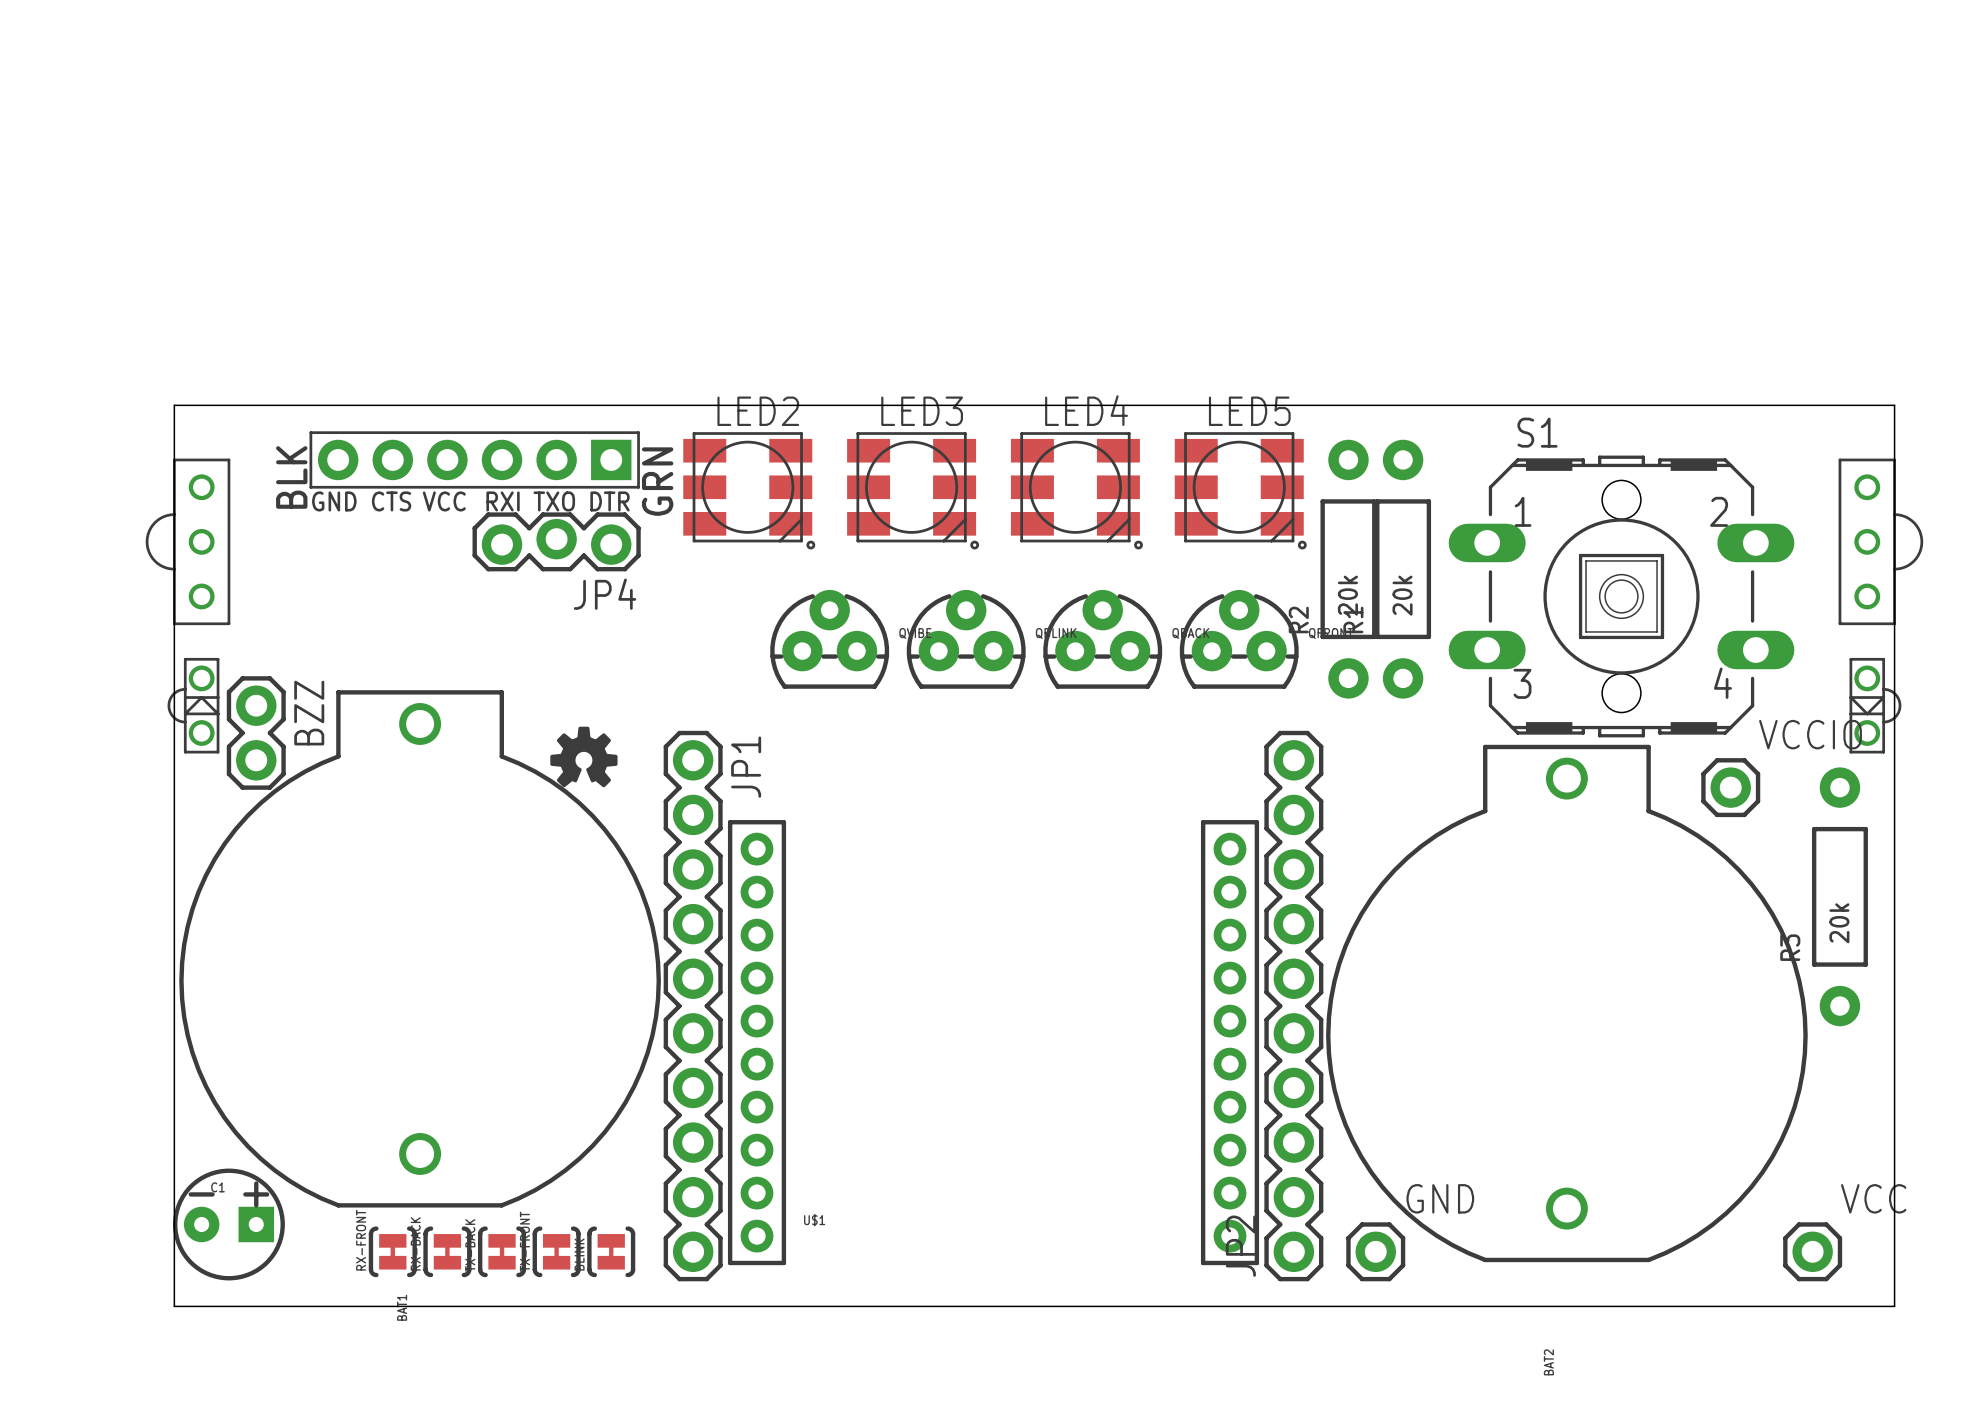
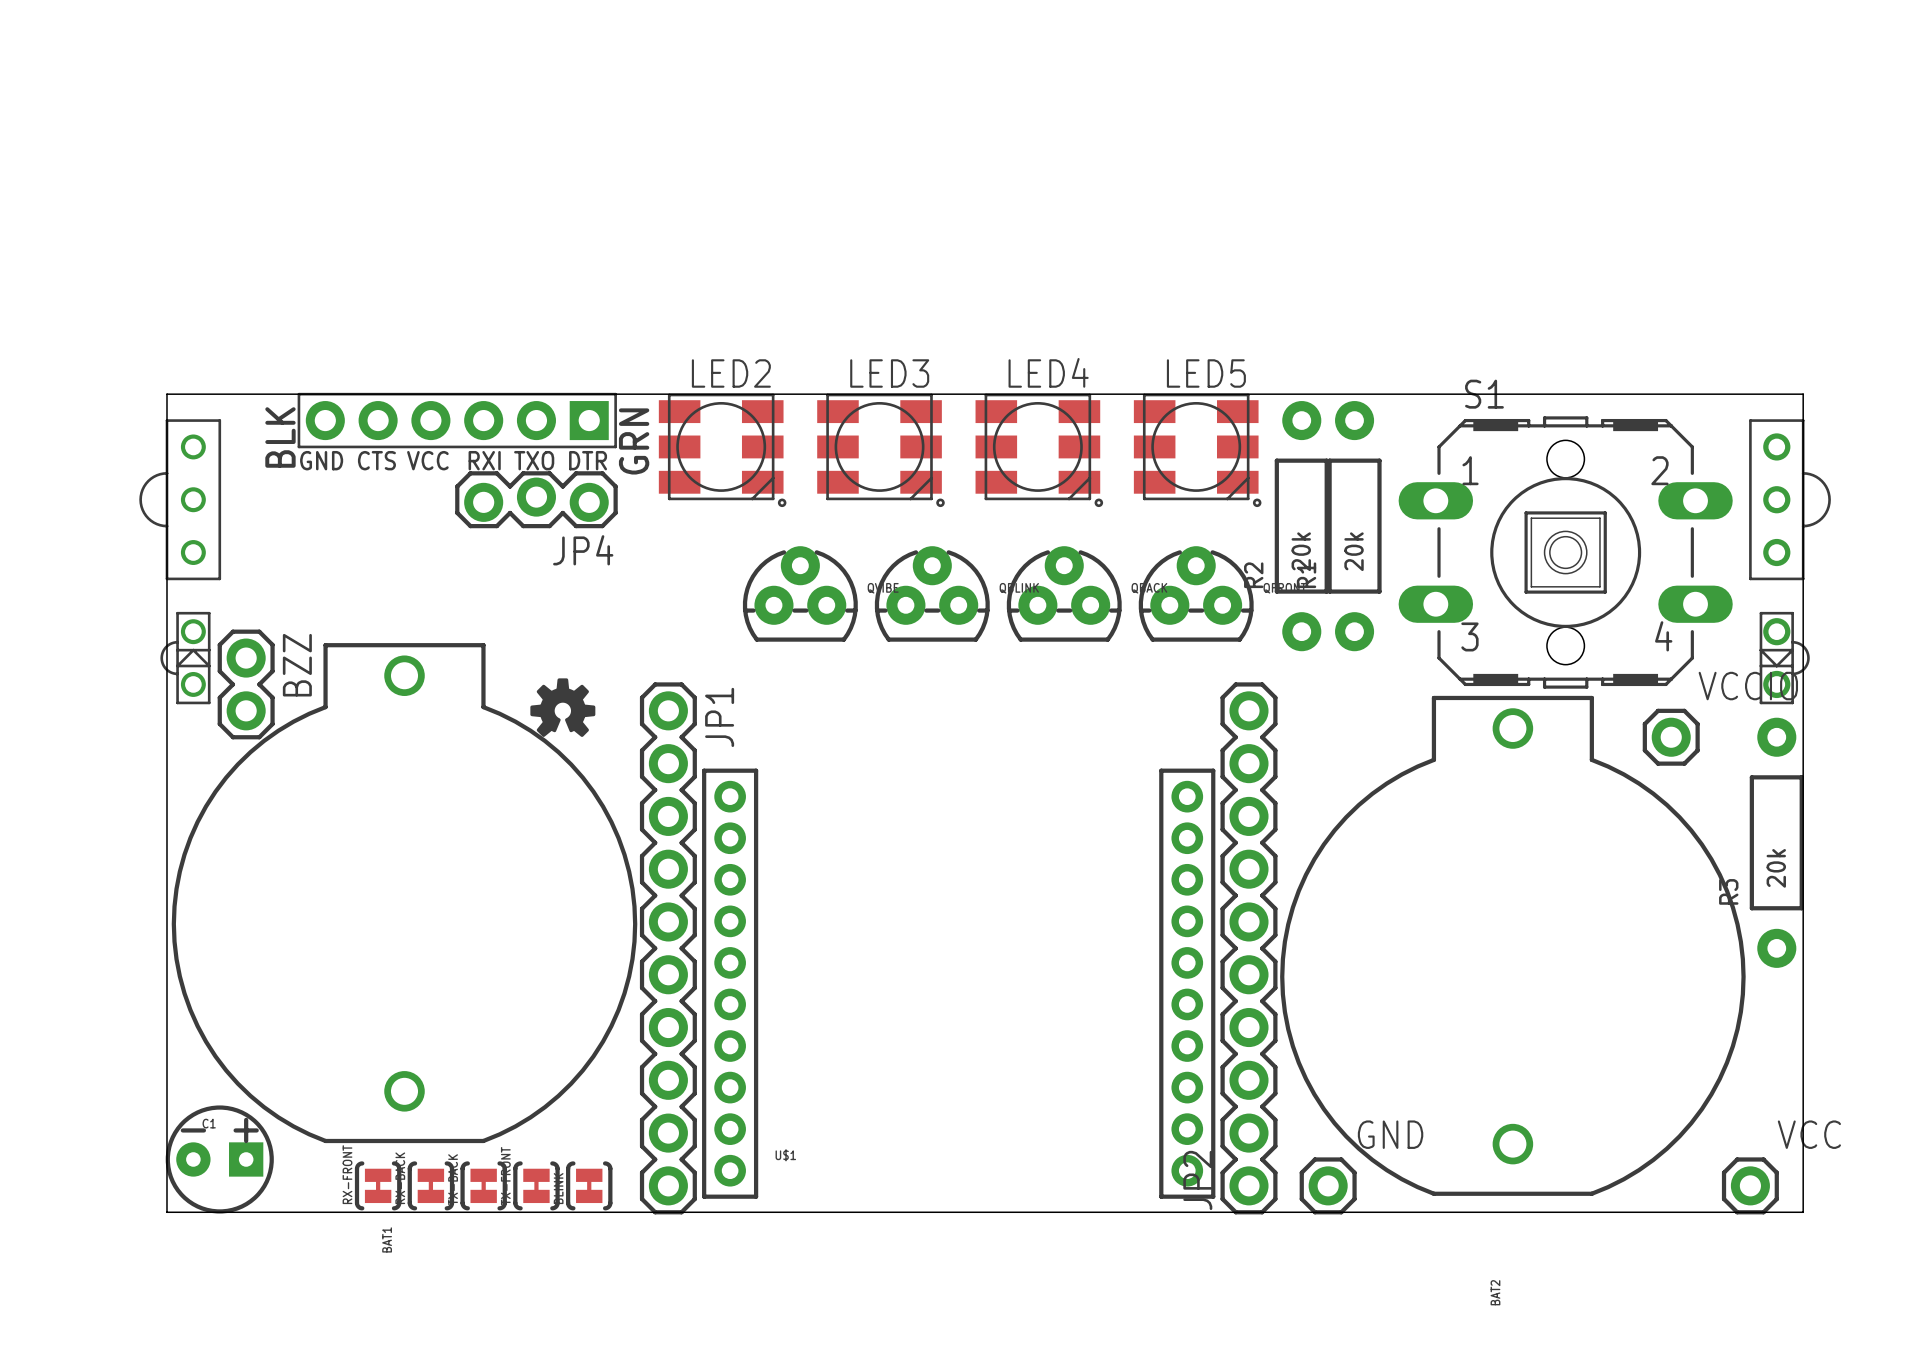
board edge: (174, 432) (174, 405) (1894, 405) (1894, 1306) (174, 1306) (174, 1279) -> (166, 394) (1803, 394) (1803, 1212) (166, 1212)
part: none -> (1789, 499)
part: (1880, 541) -> none
part: none -> (1784, 658)
part: (1875, 705) -> none

